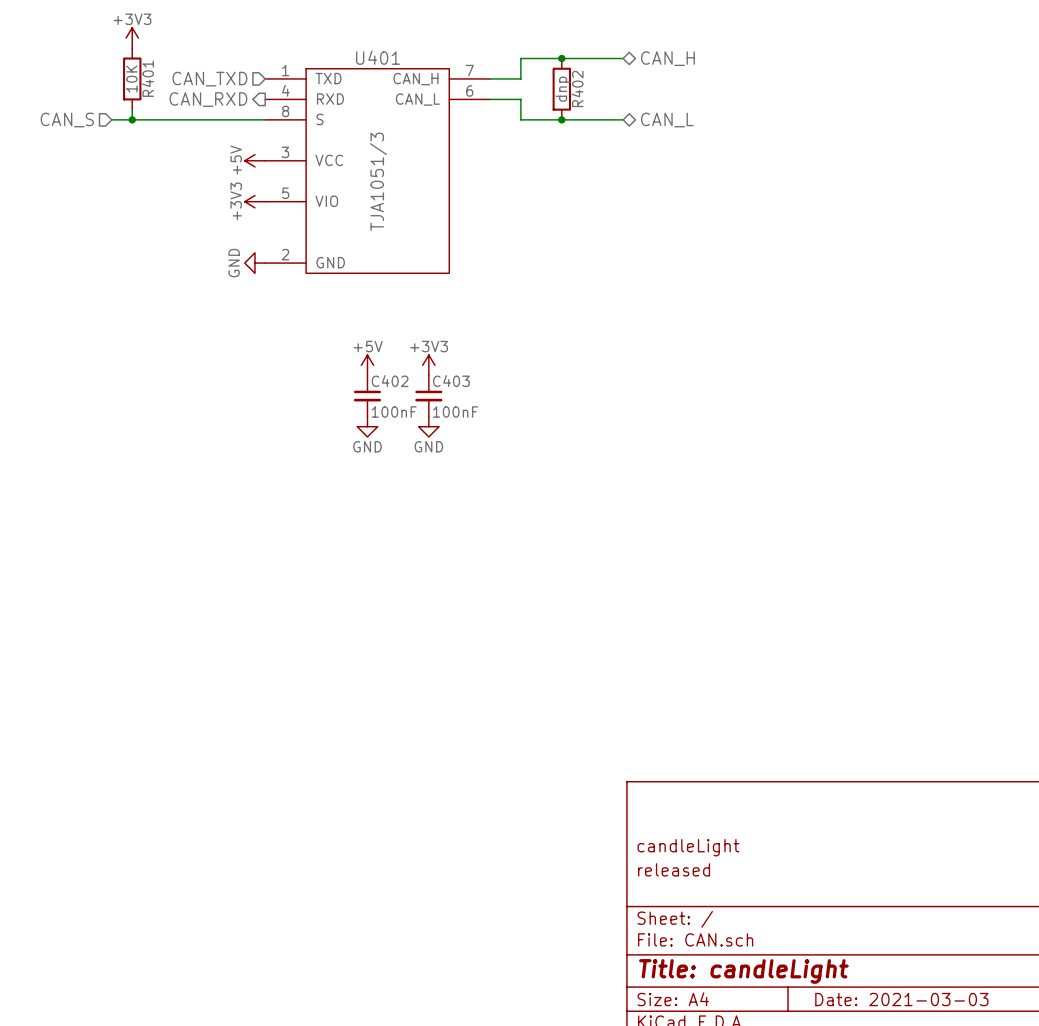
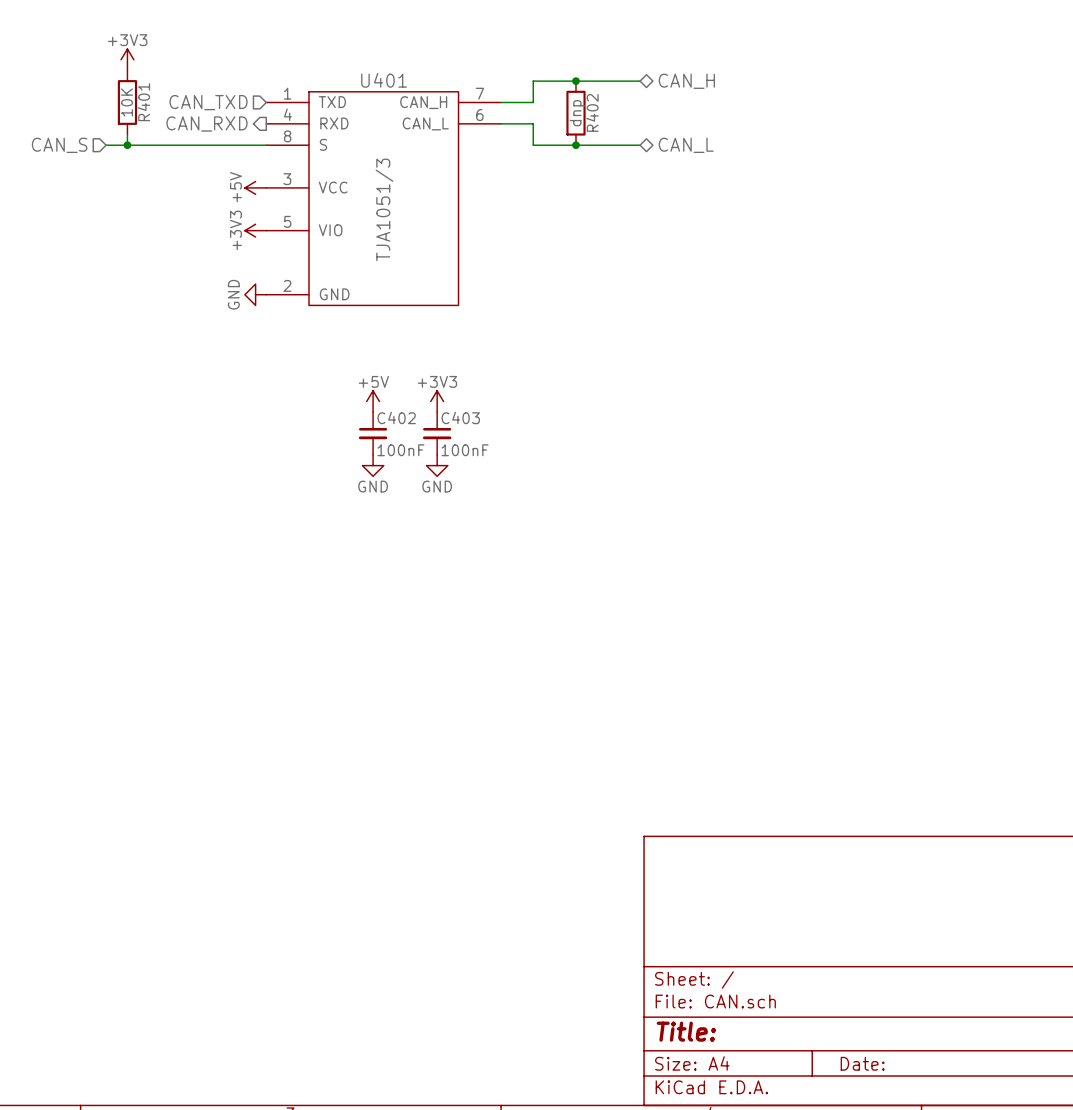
title block: candleLight (688, 847) -> none
title block: released (674, 869) -> none
title block: Title: candleLight (743, 971) -> Title: (686, 1031)
title block: Date: 2021-03-03 (901, 999) -> Date: (862, 1063)

